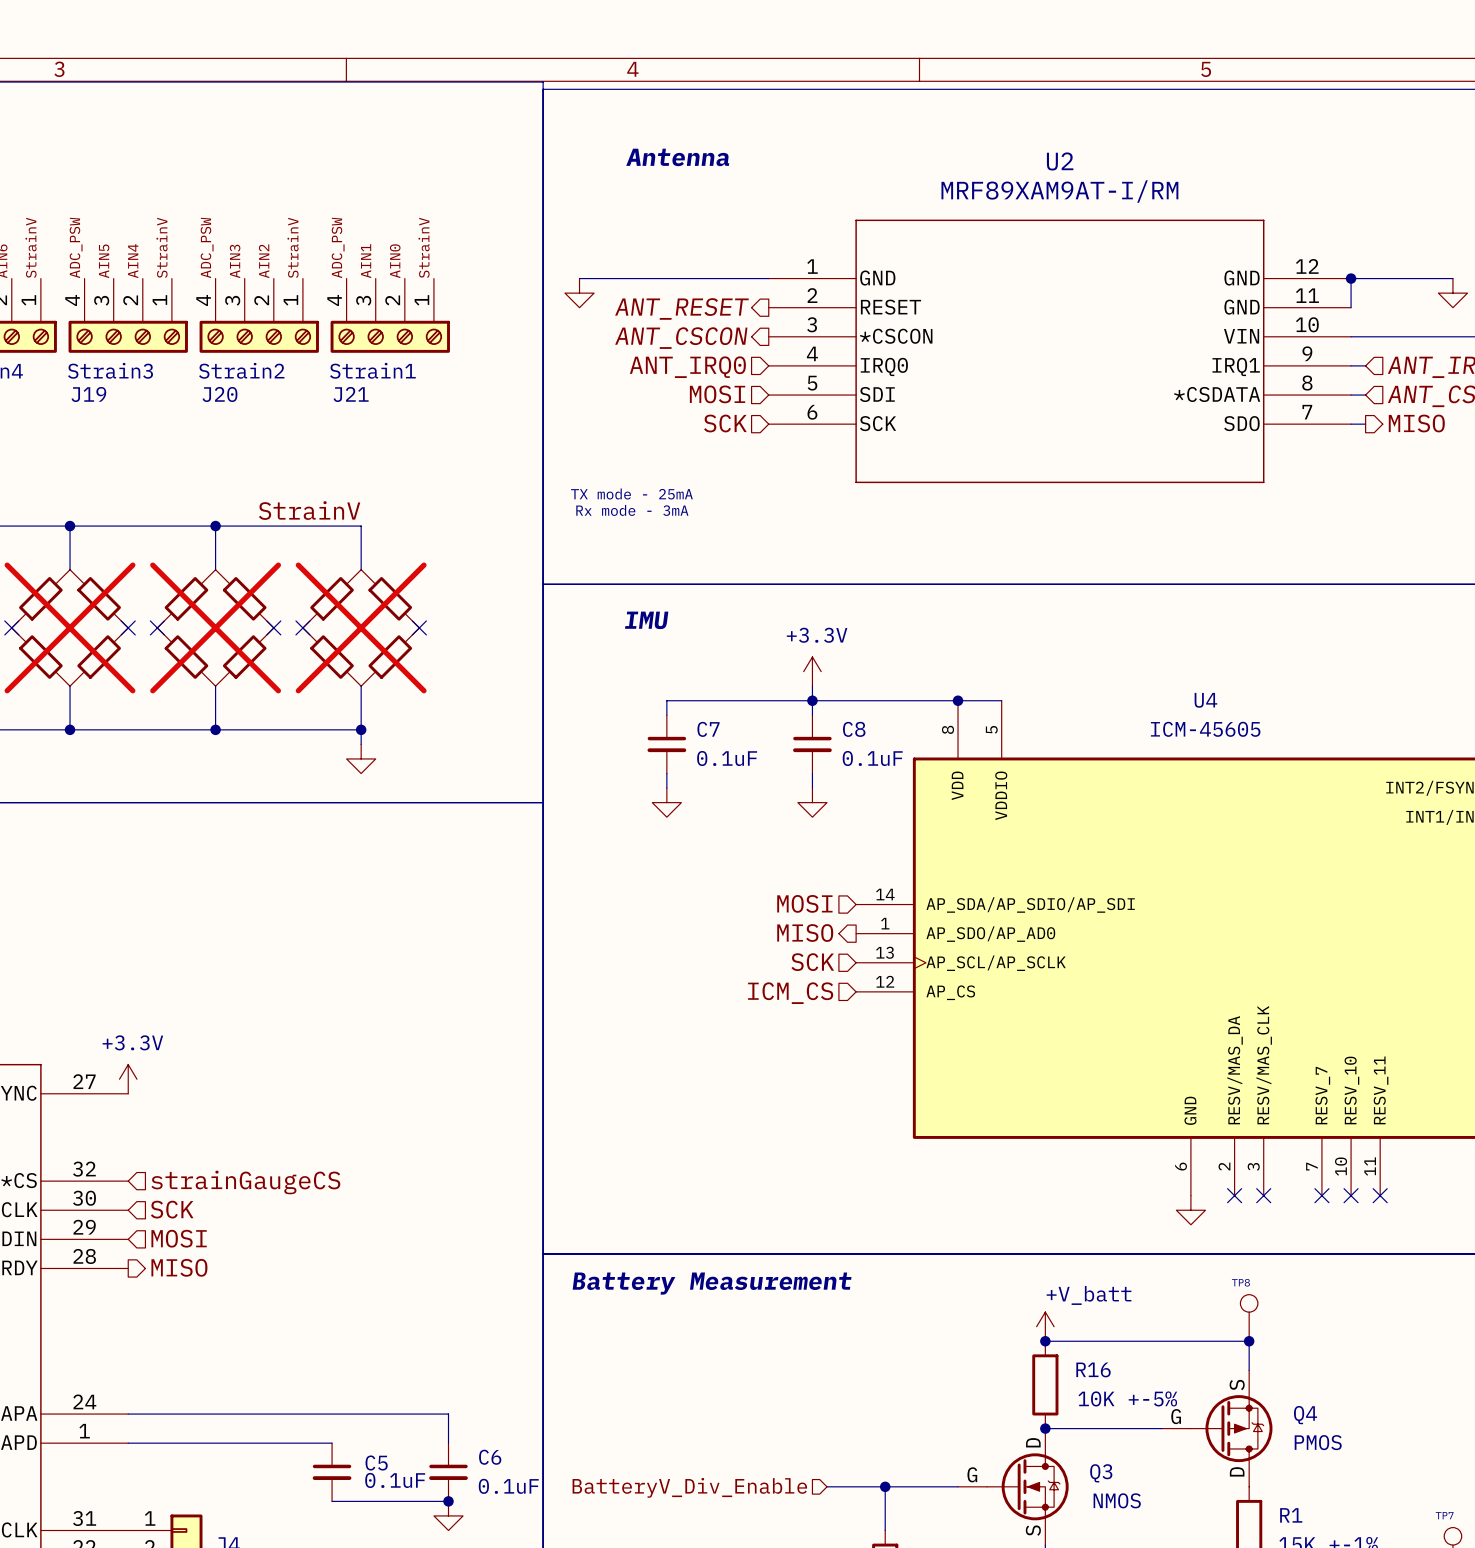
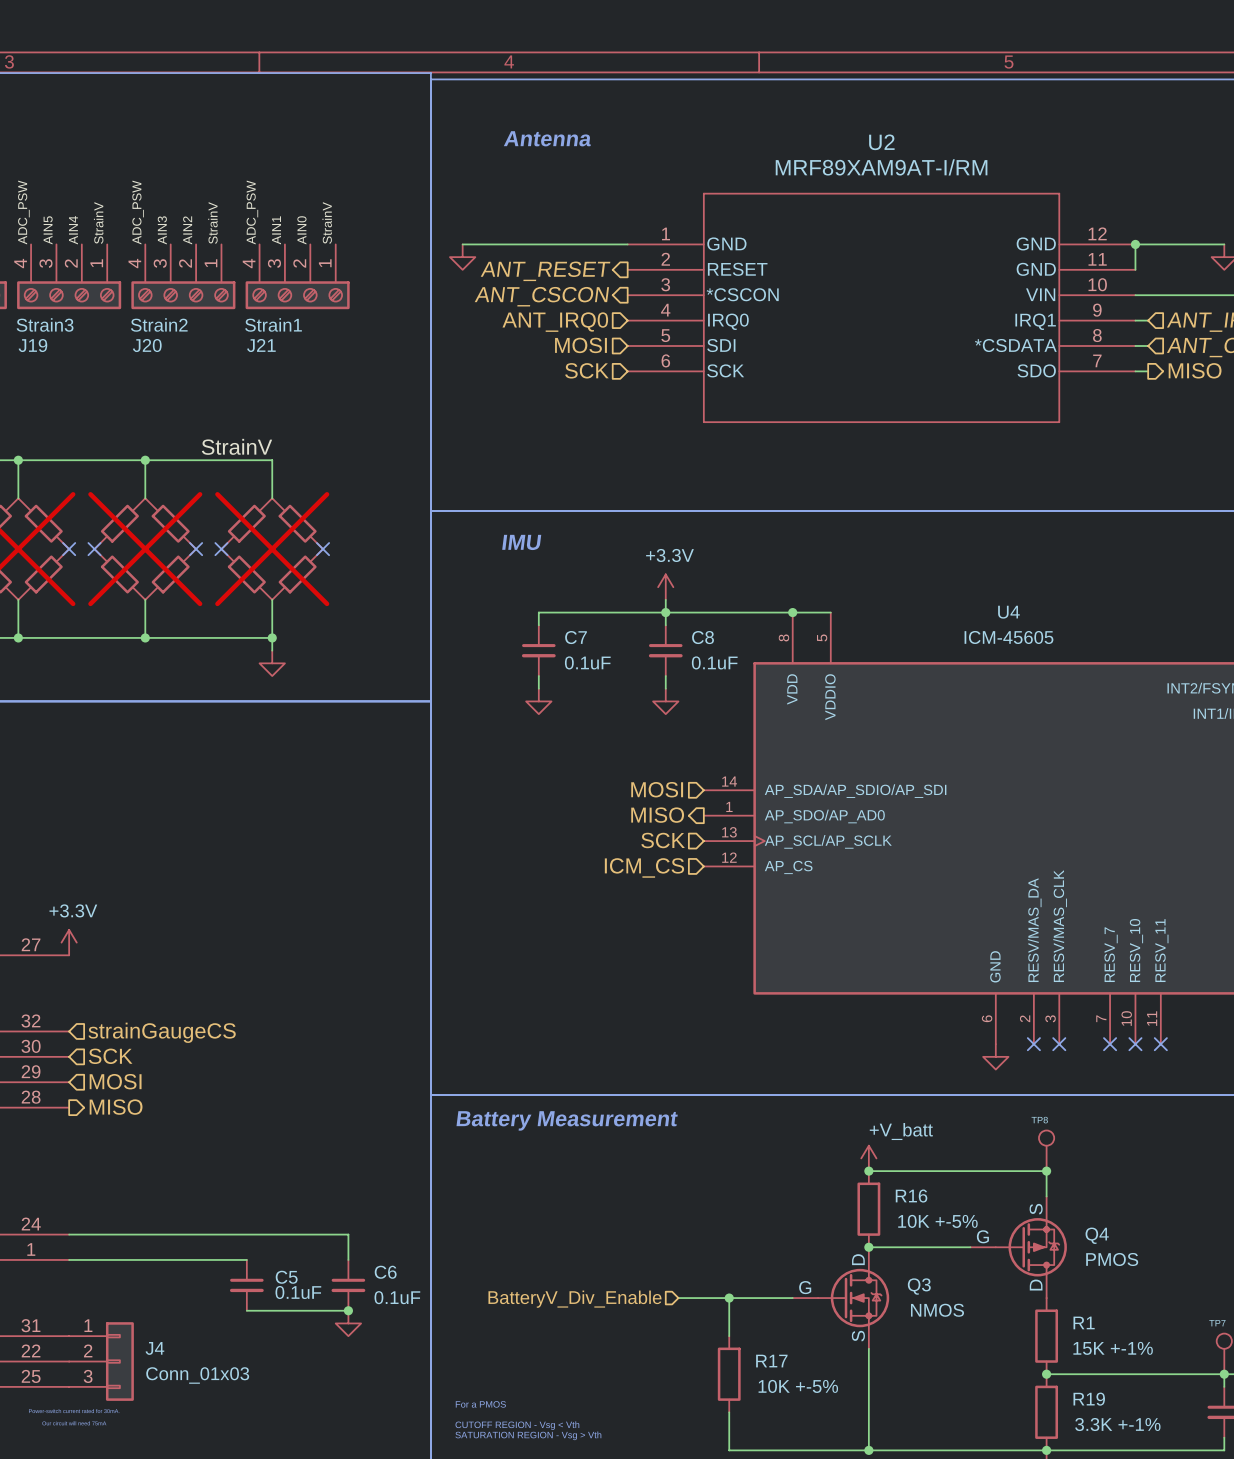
text: TX mode - 25mA (631, 494) -> none
text: Rx mode - 3mA (632, 510) -> none

